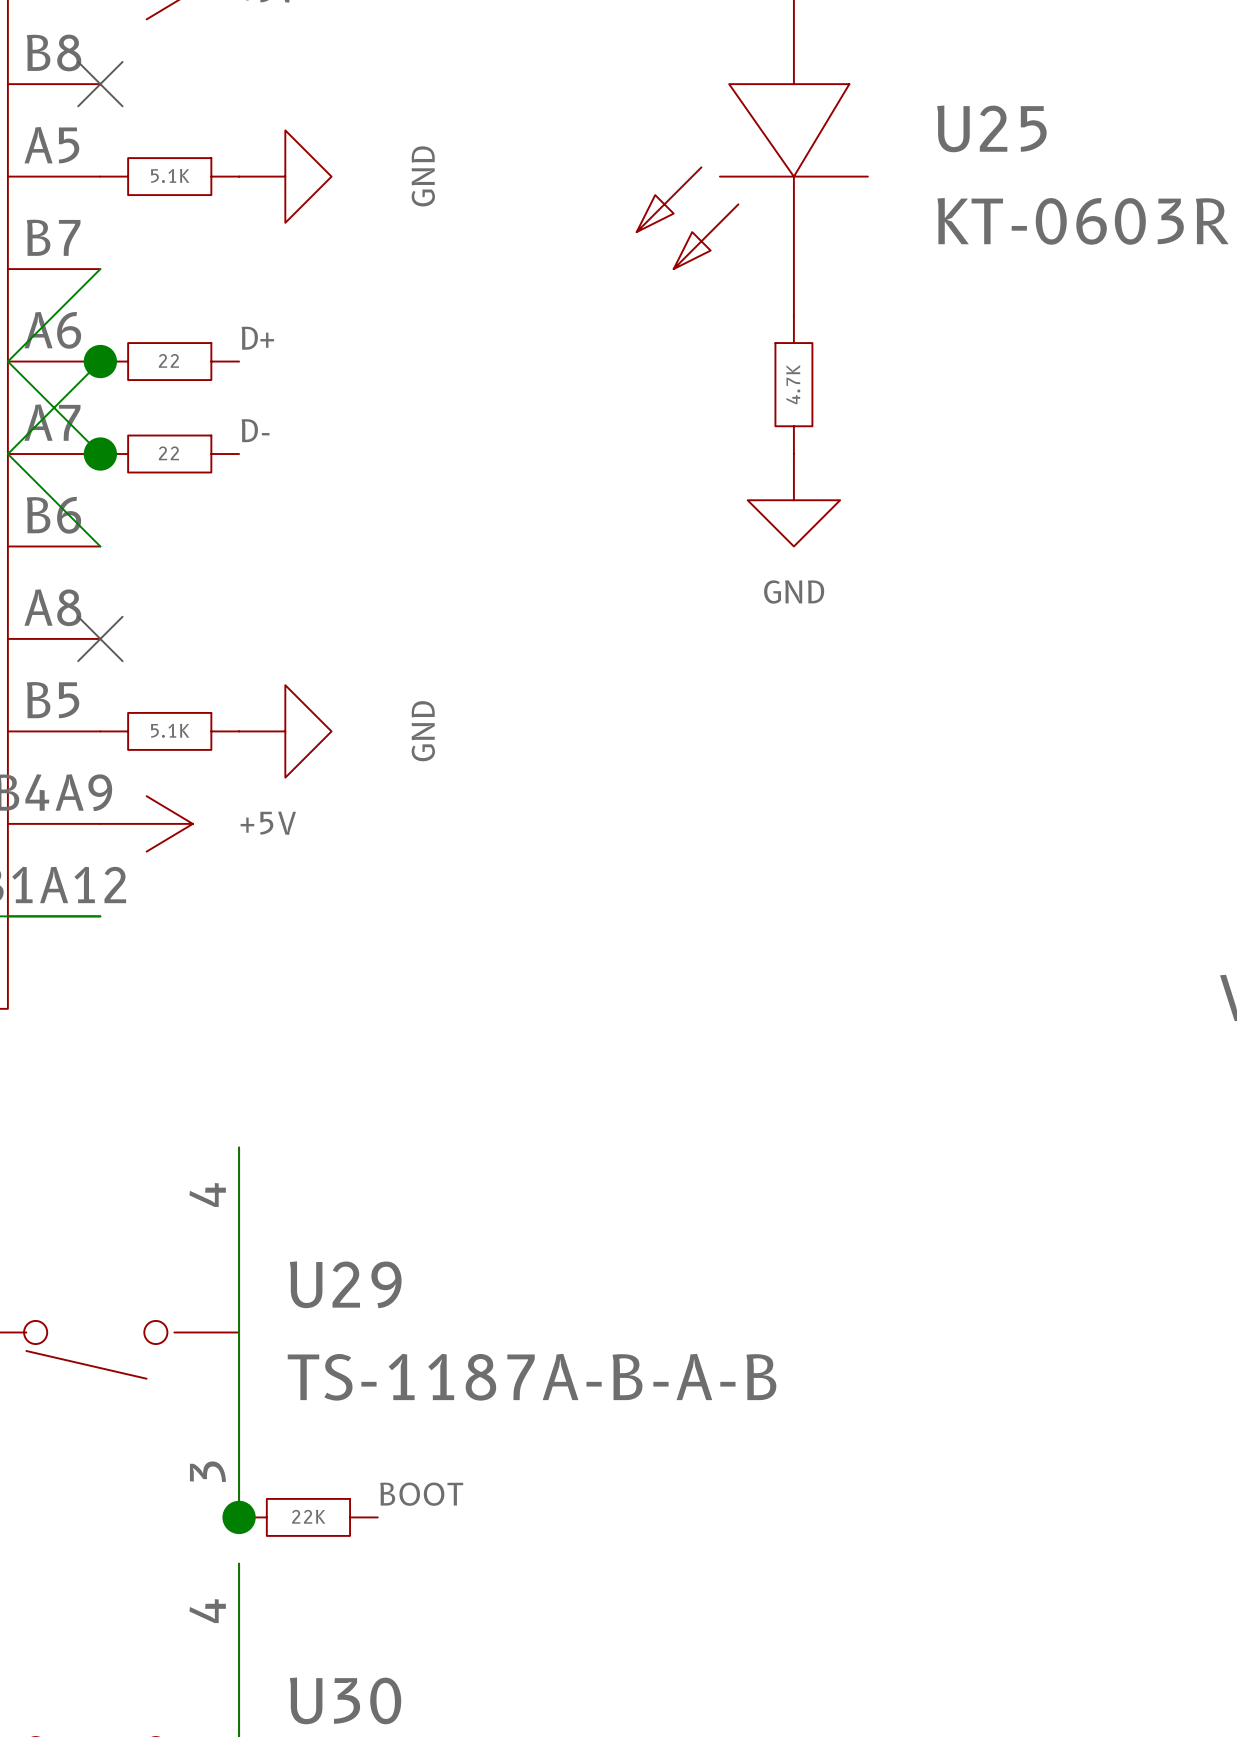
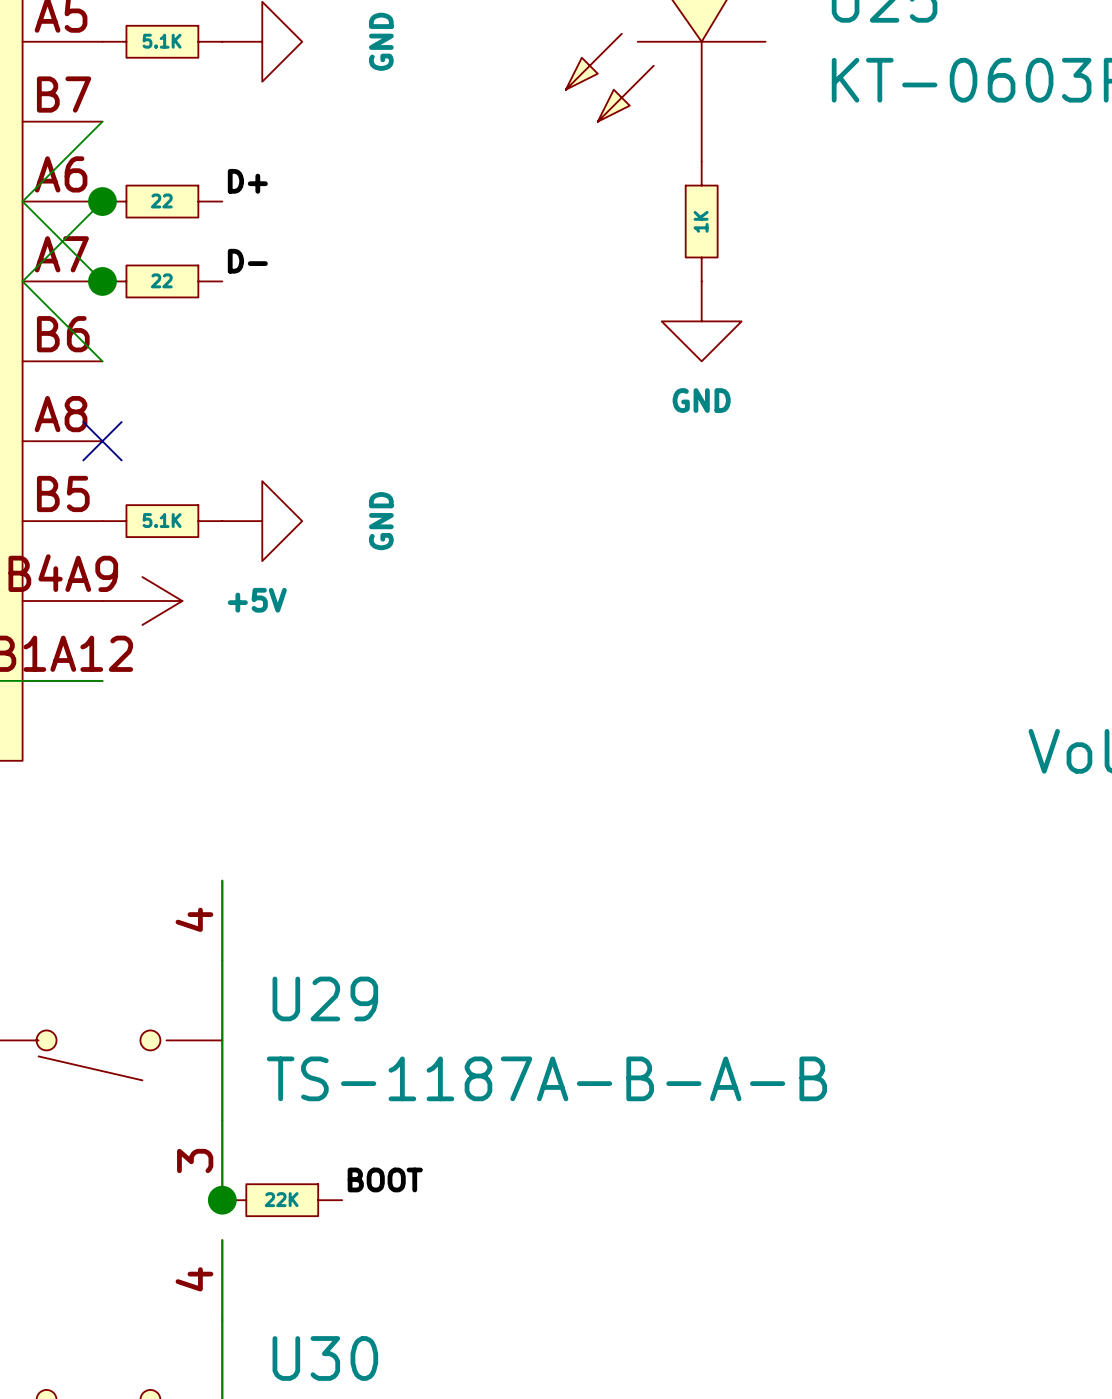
part value: 4.7K (793, 384) -> 1K (701, 221)

